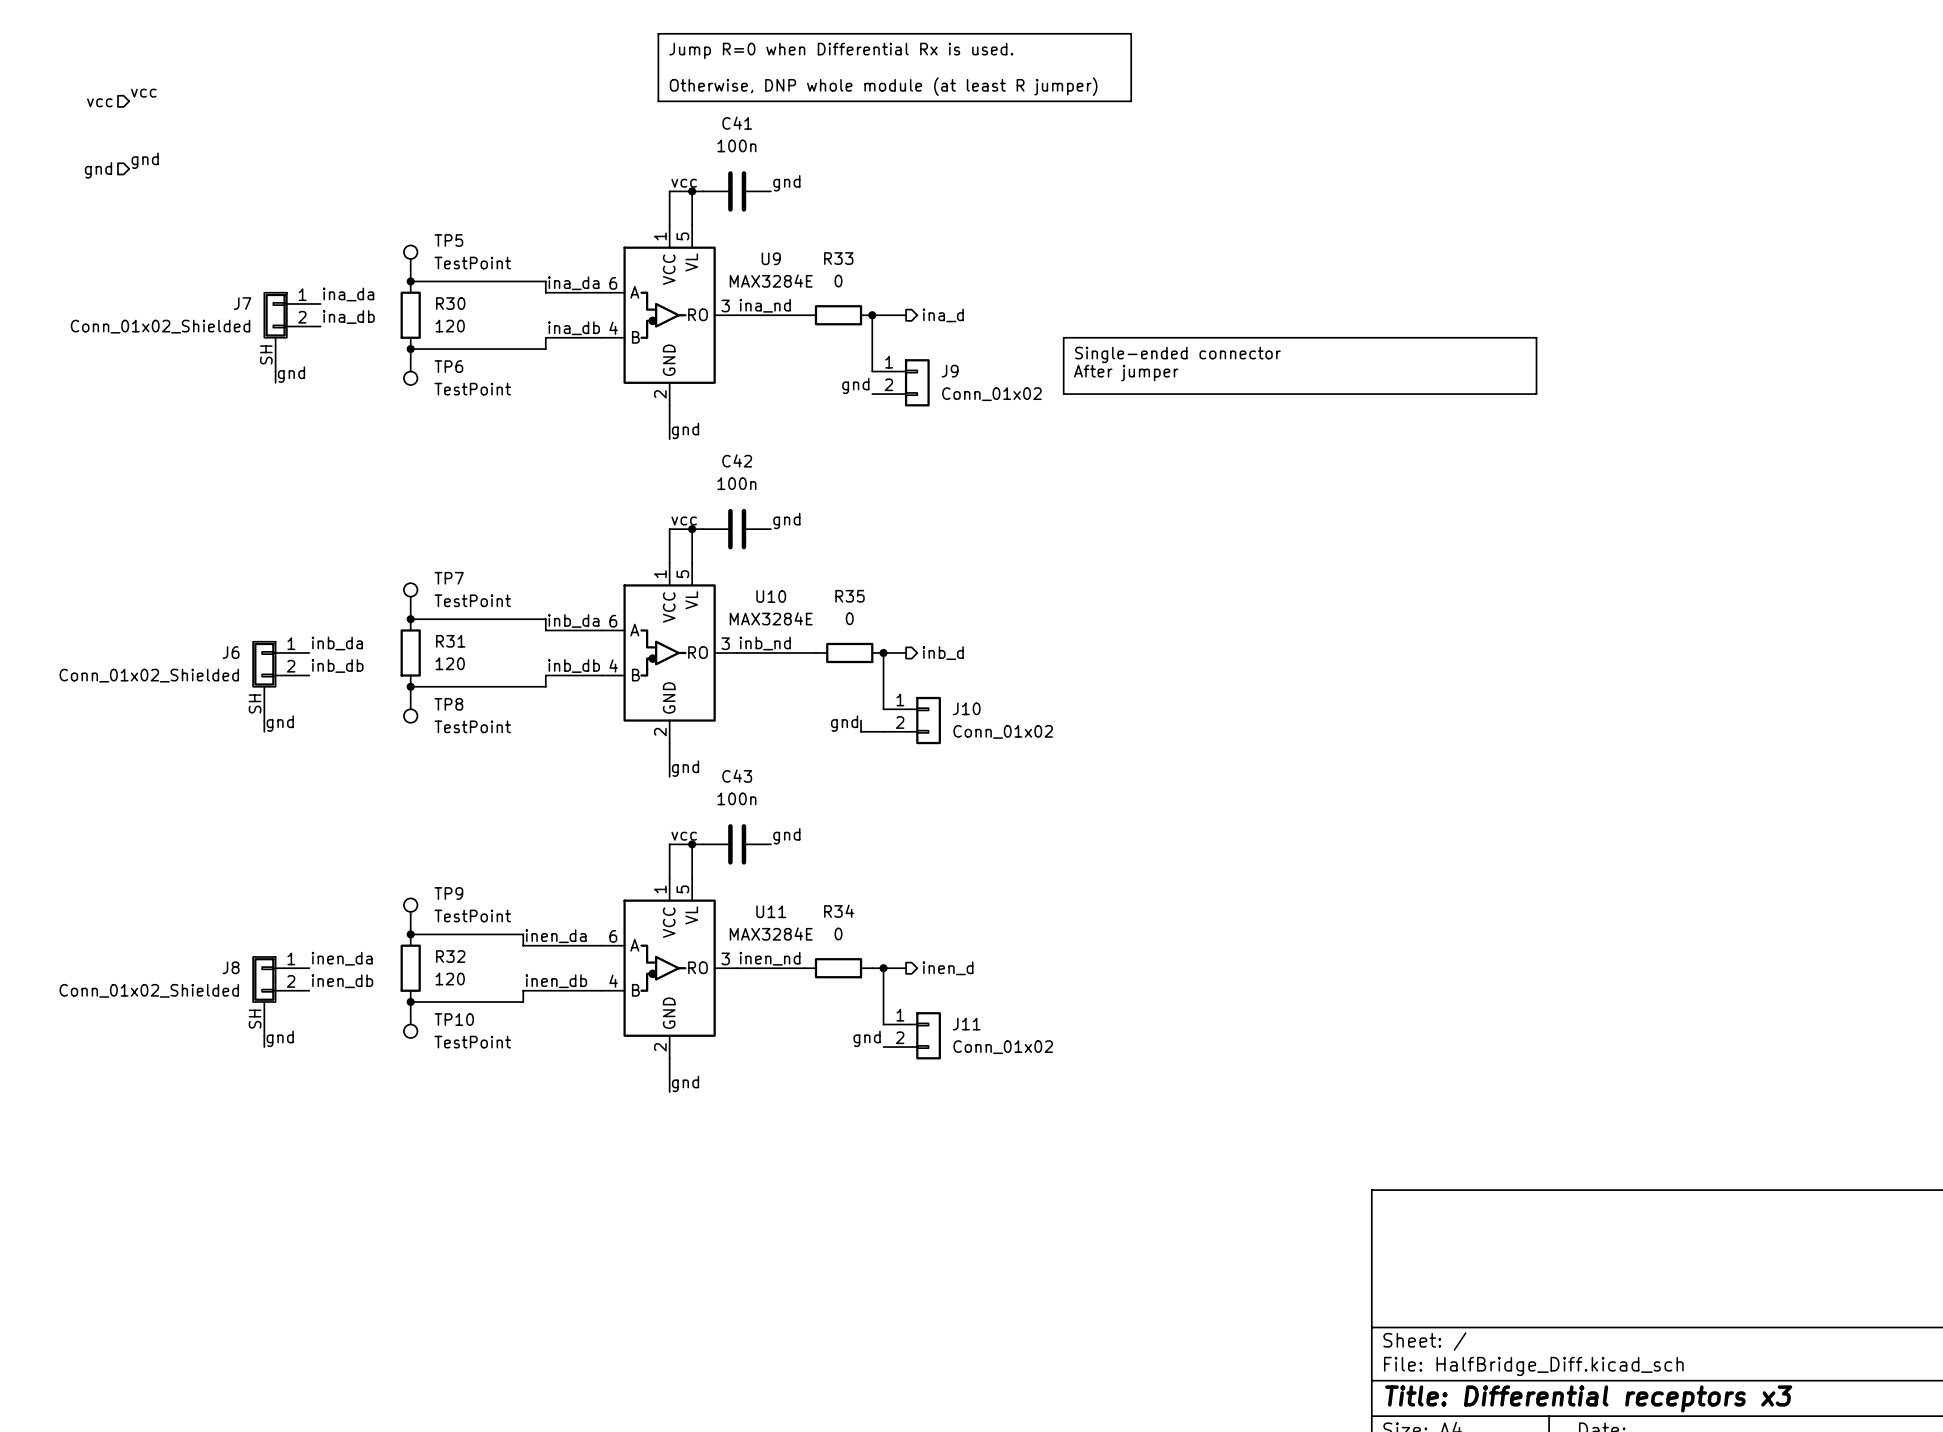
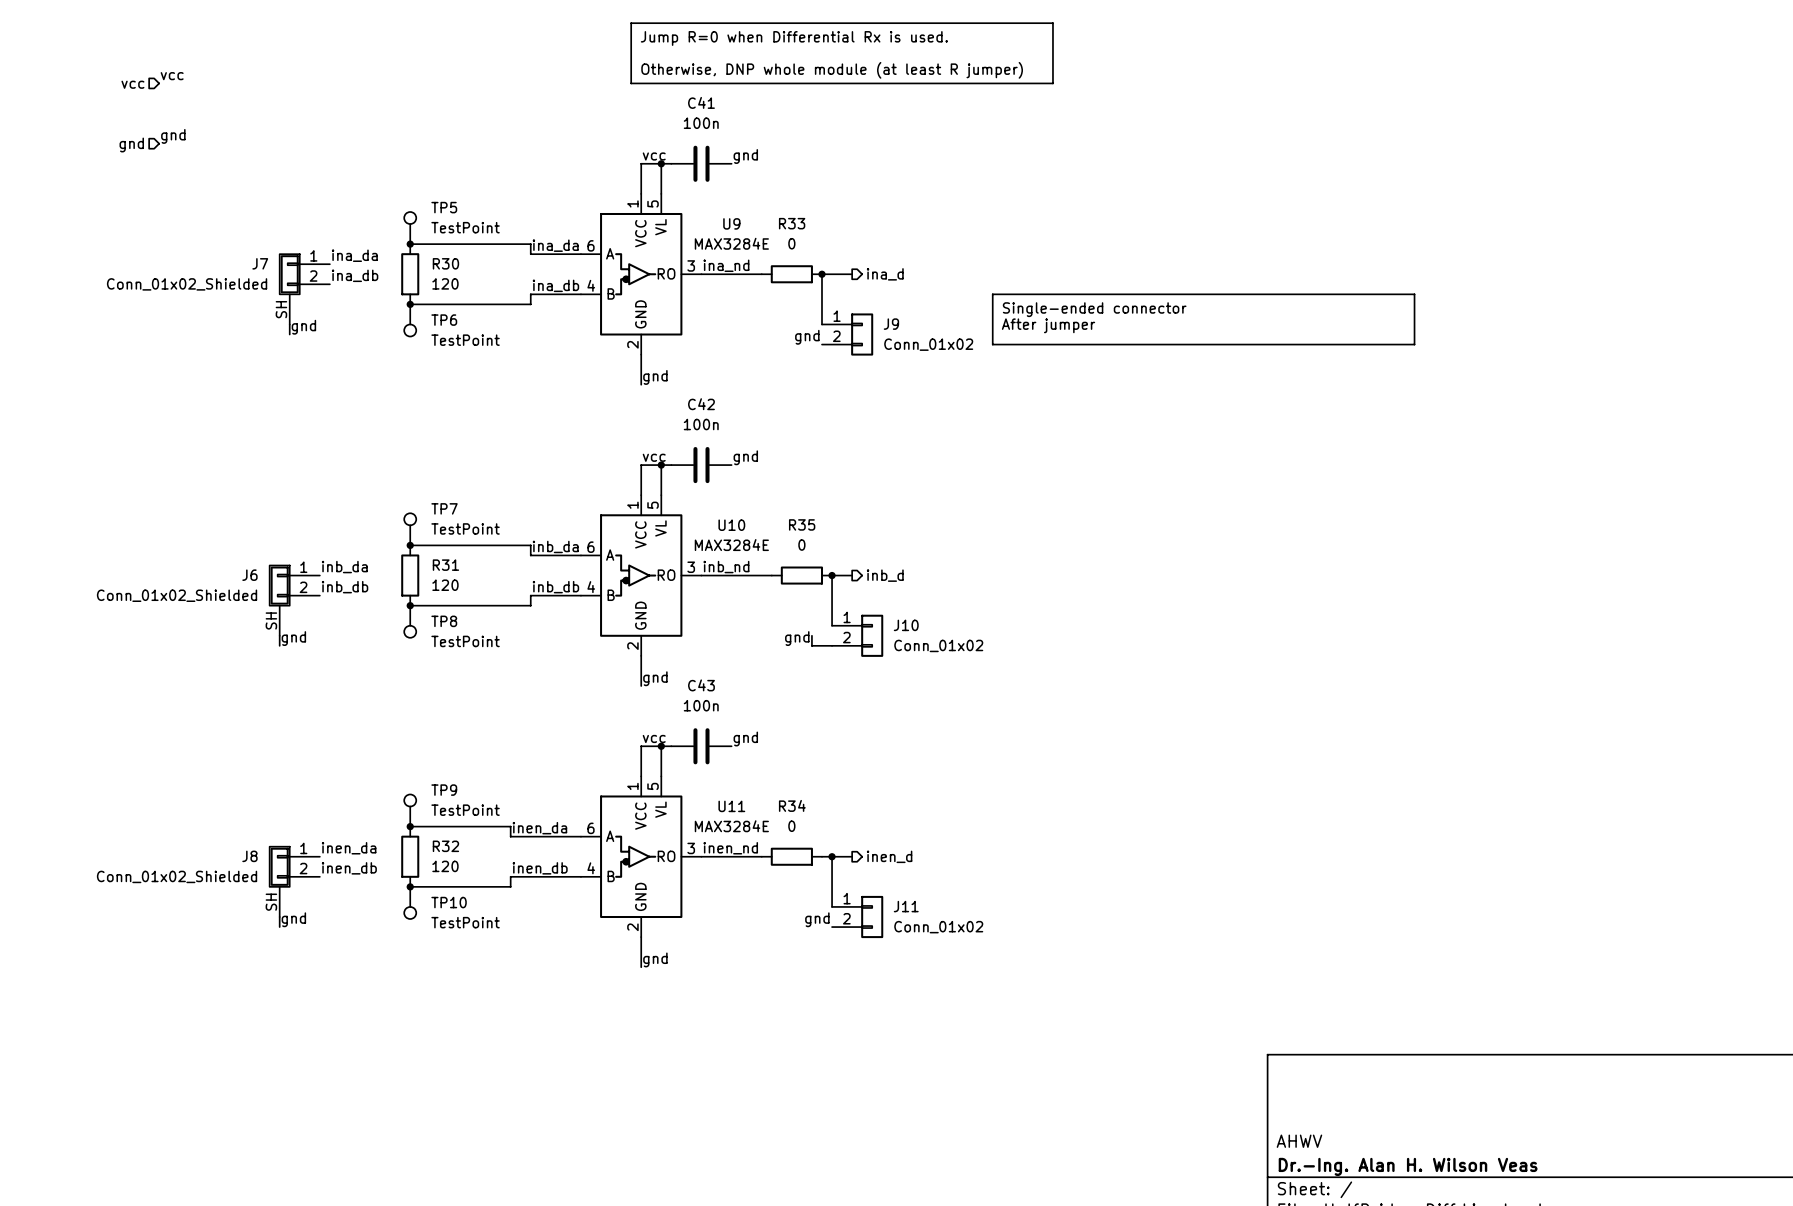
title block: none -> AHWV (1299, 1141)
title block: none -> Dr.-Ing. Alan H. Wilson Veas (1408, 1166)

